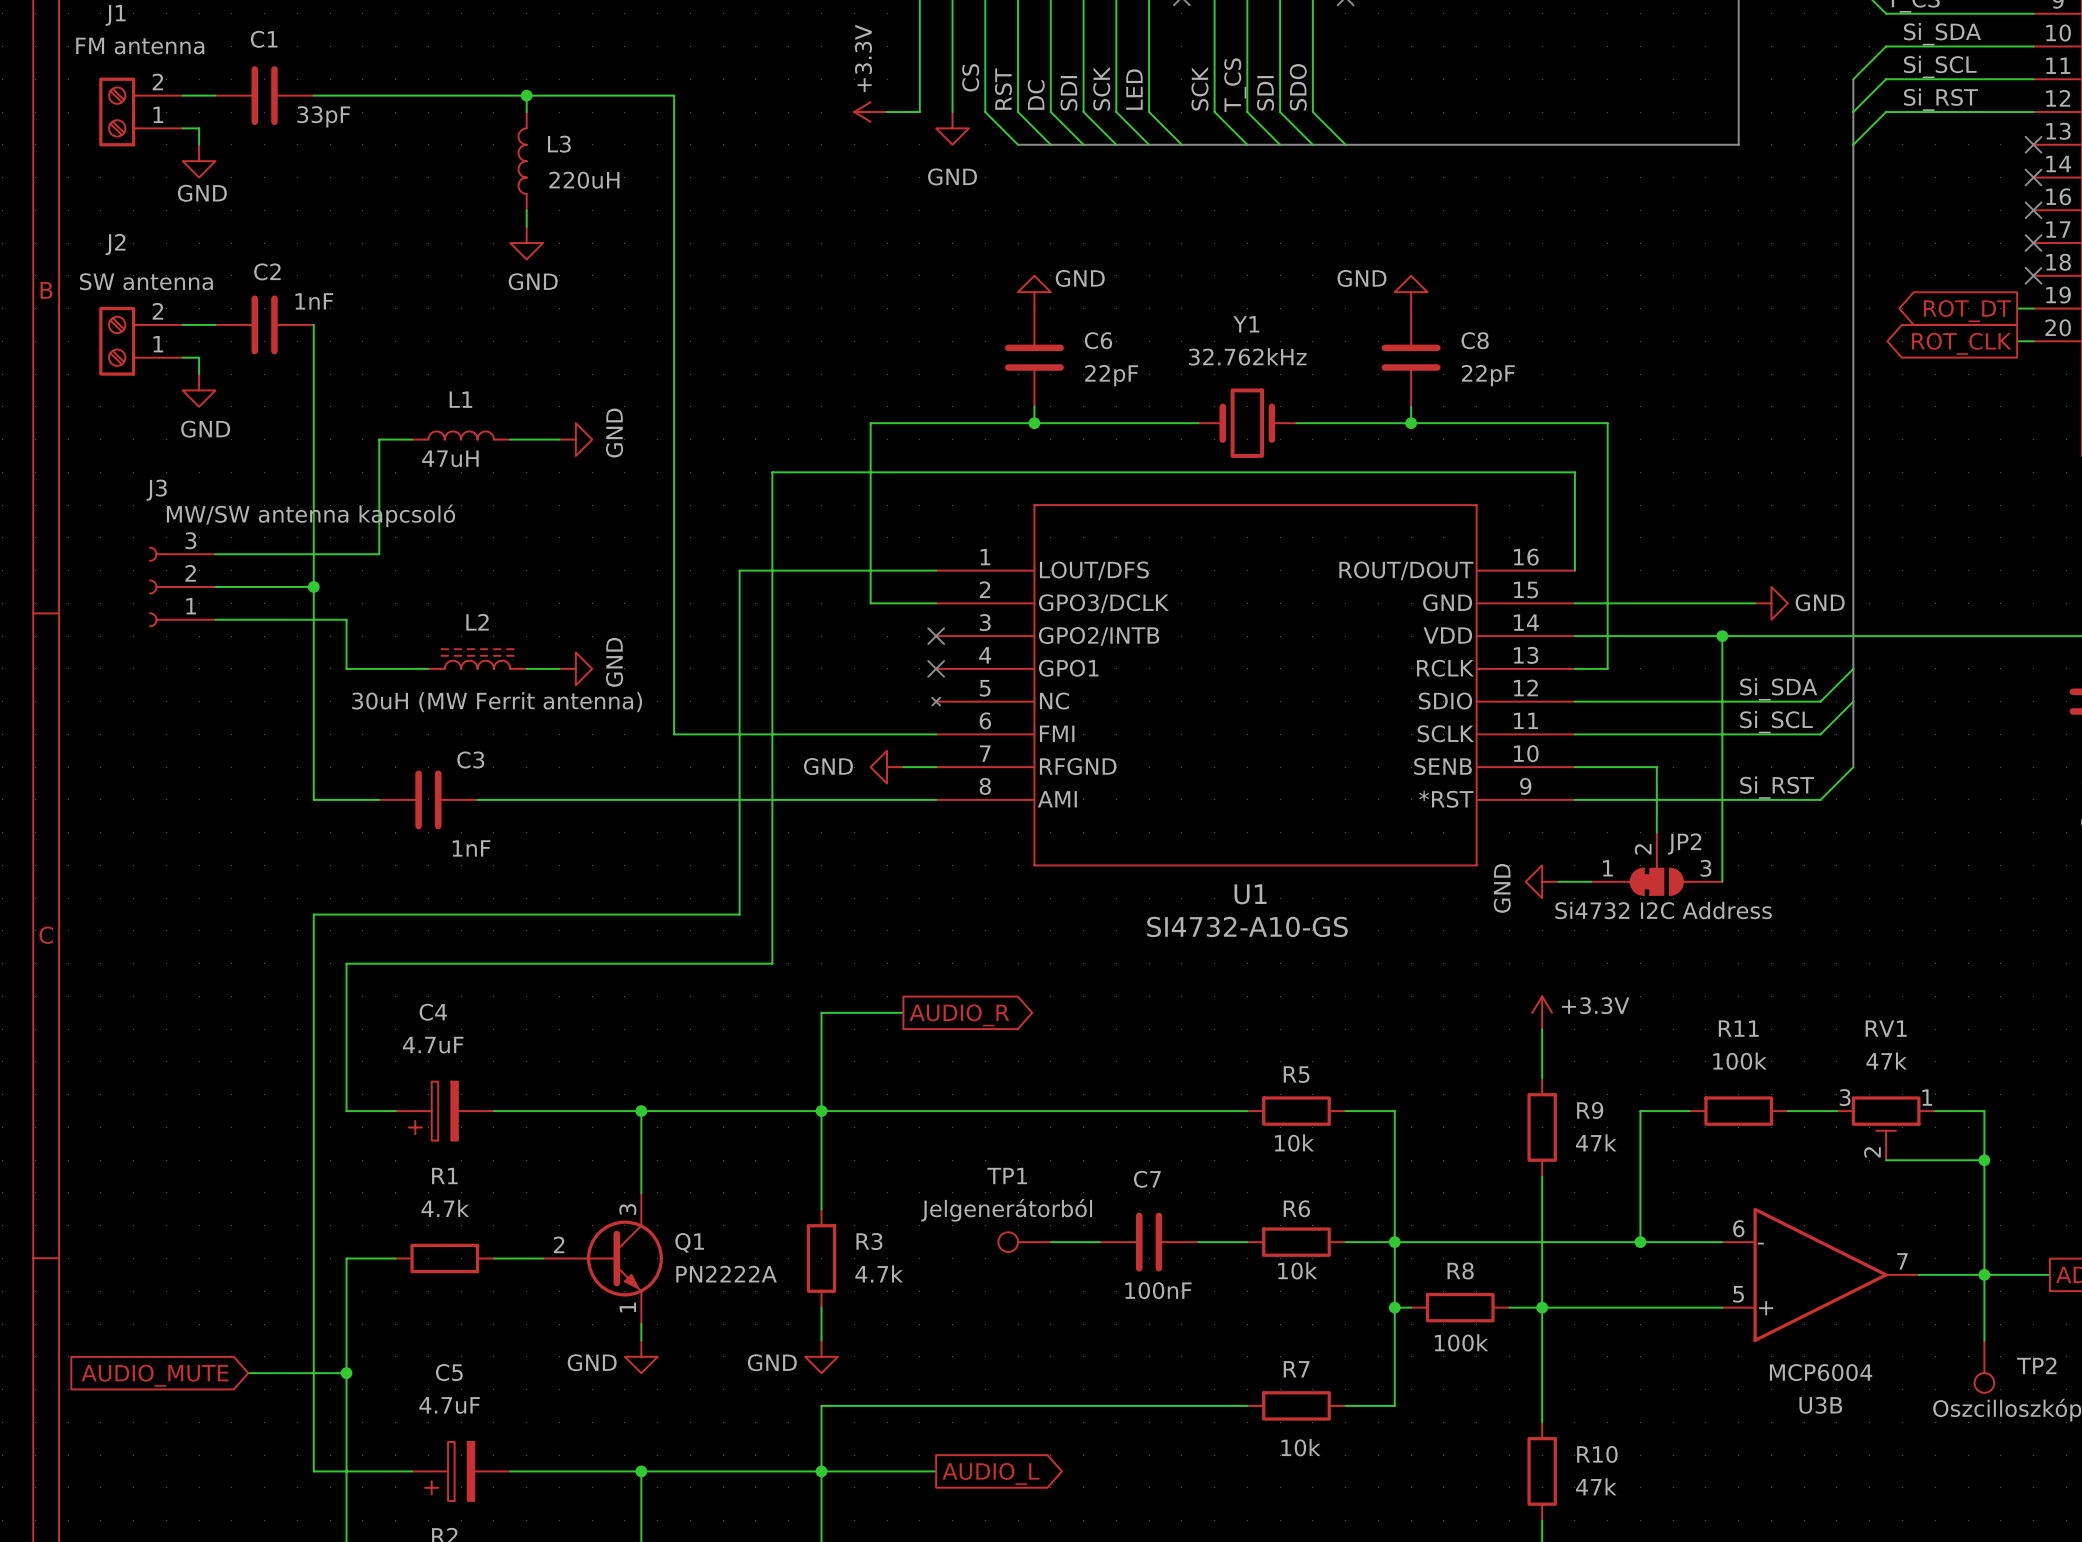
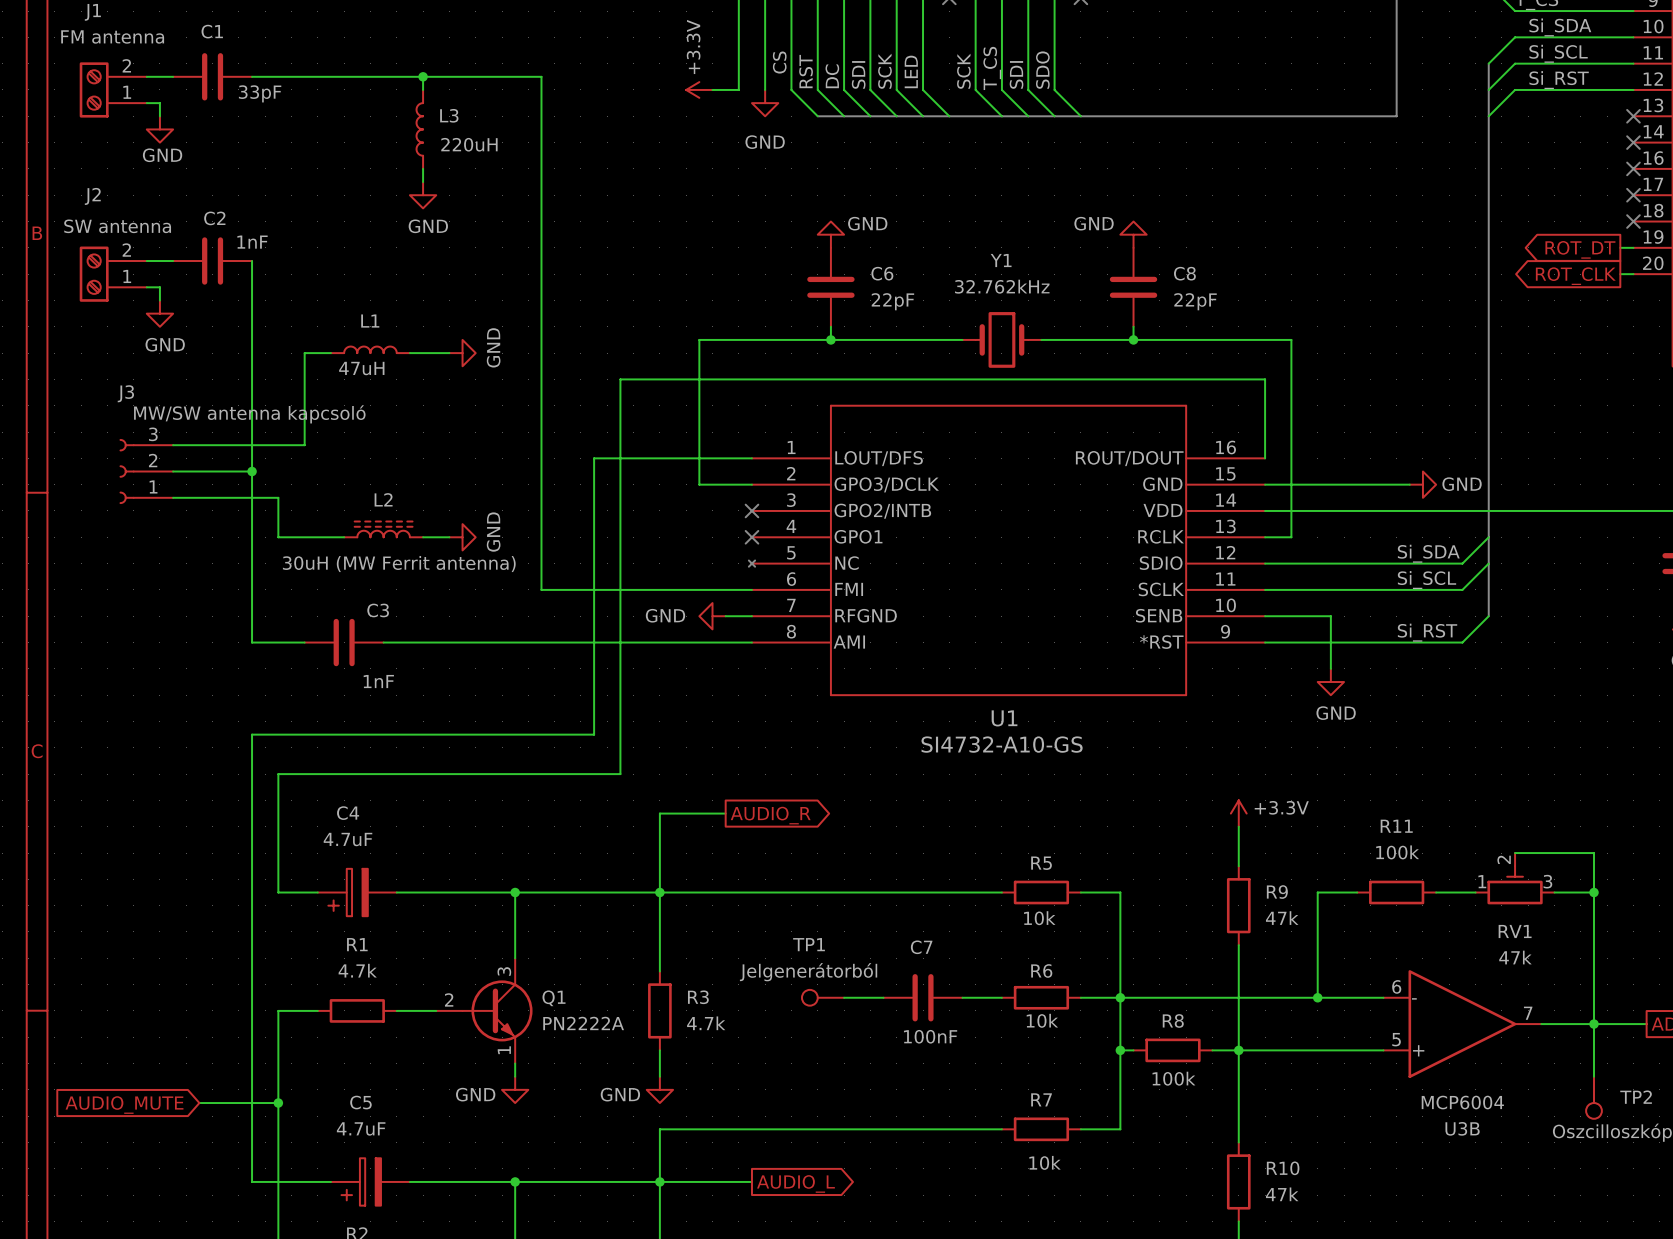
wire: (1722, 636) (1722, 881) -> none
junction: (1722, 636) -> none
JP2: Si4732 I2C Address (1656, 863) -> none
power symbol rotation: 0° (1542, 881) -> 90° counterclockwise (1330, 682)
power symbol position: GND (1542, 881) -> GND (1330, 682)
wire: (1558, 881) (1591, 881) -> none
RV1 name position: RV1 (1886, 1028) -> RV1 (1515, 931)
wire: none -> (1515, 853) (1594, 853) (1594, 892)
RV1 value position: 47k (1886, 1061) -> 47k (1515, 957)
RV1 rotation: 0° (1886, 1120) -> 180° (1515, 885)
wire: (1886, 1160) (1984, 1160) -> none
junction position: (1984, 1160) -> (1594, 892)

